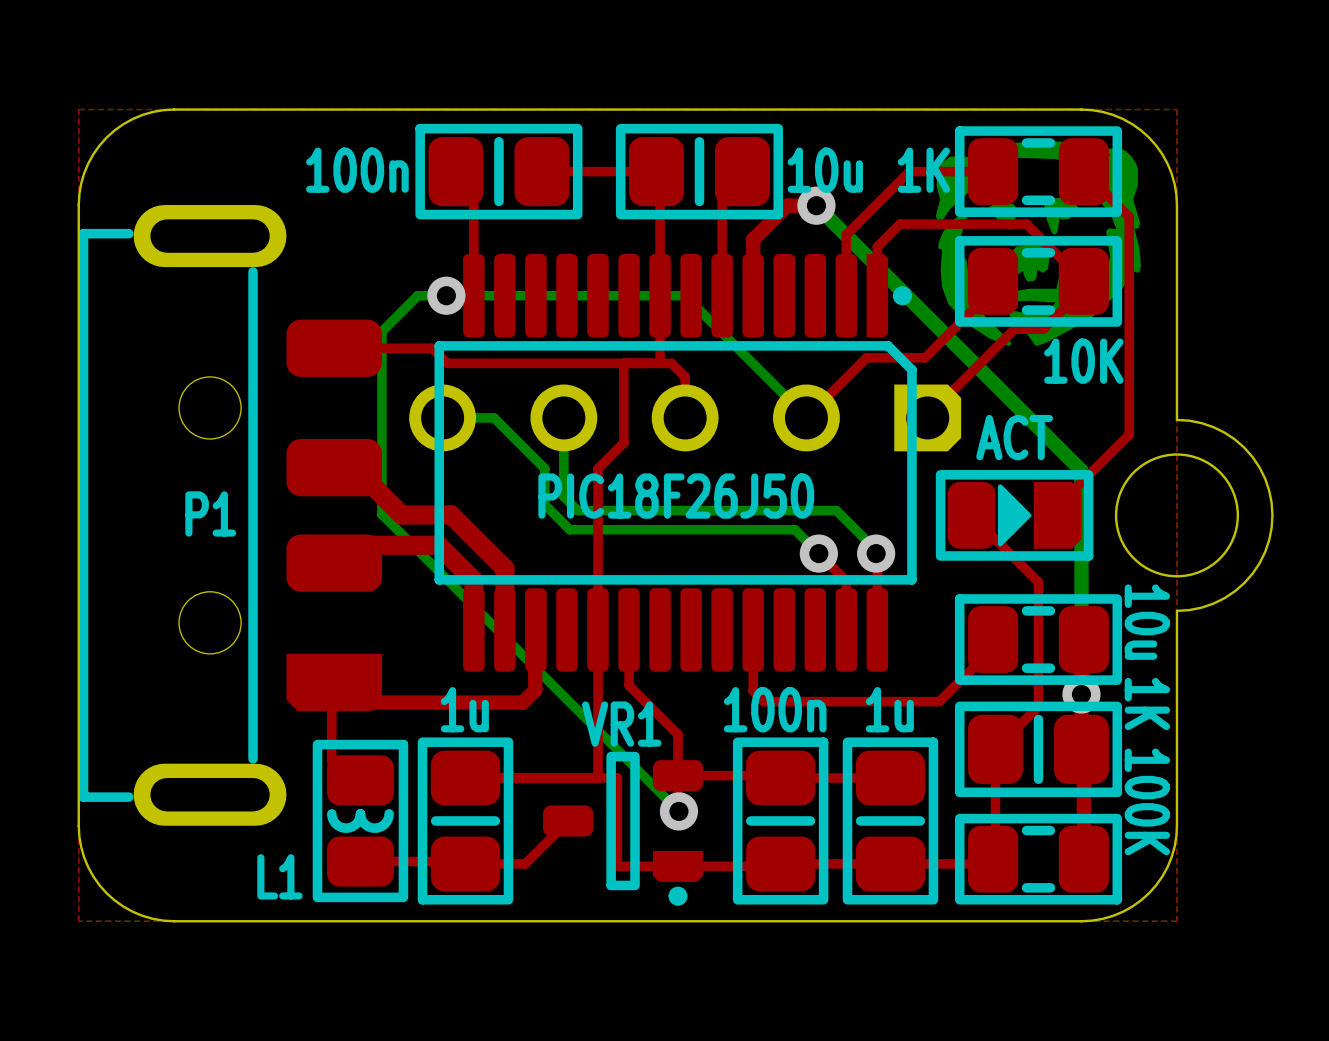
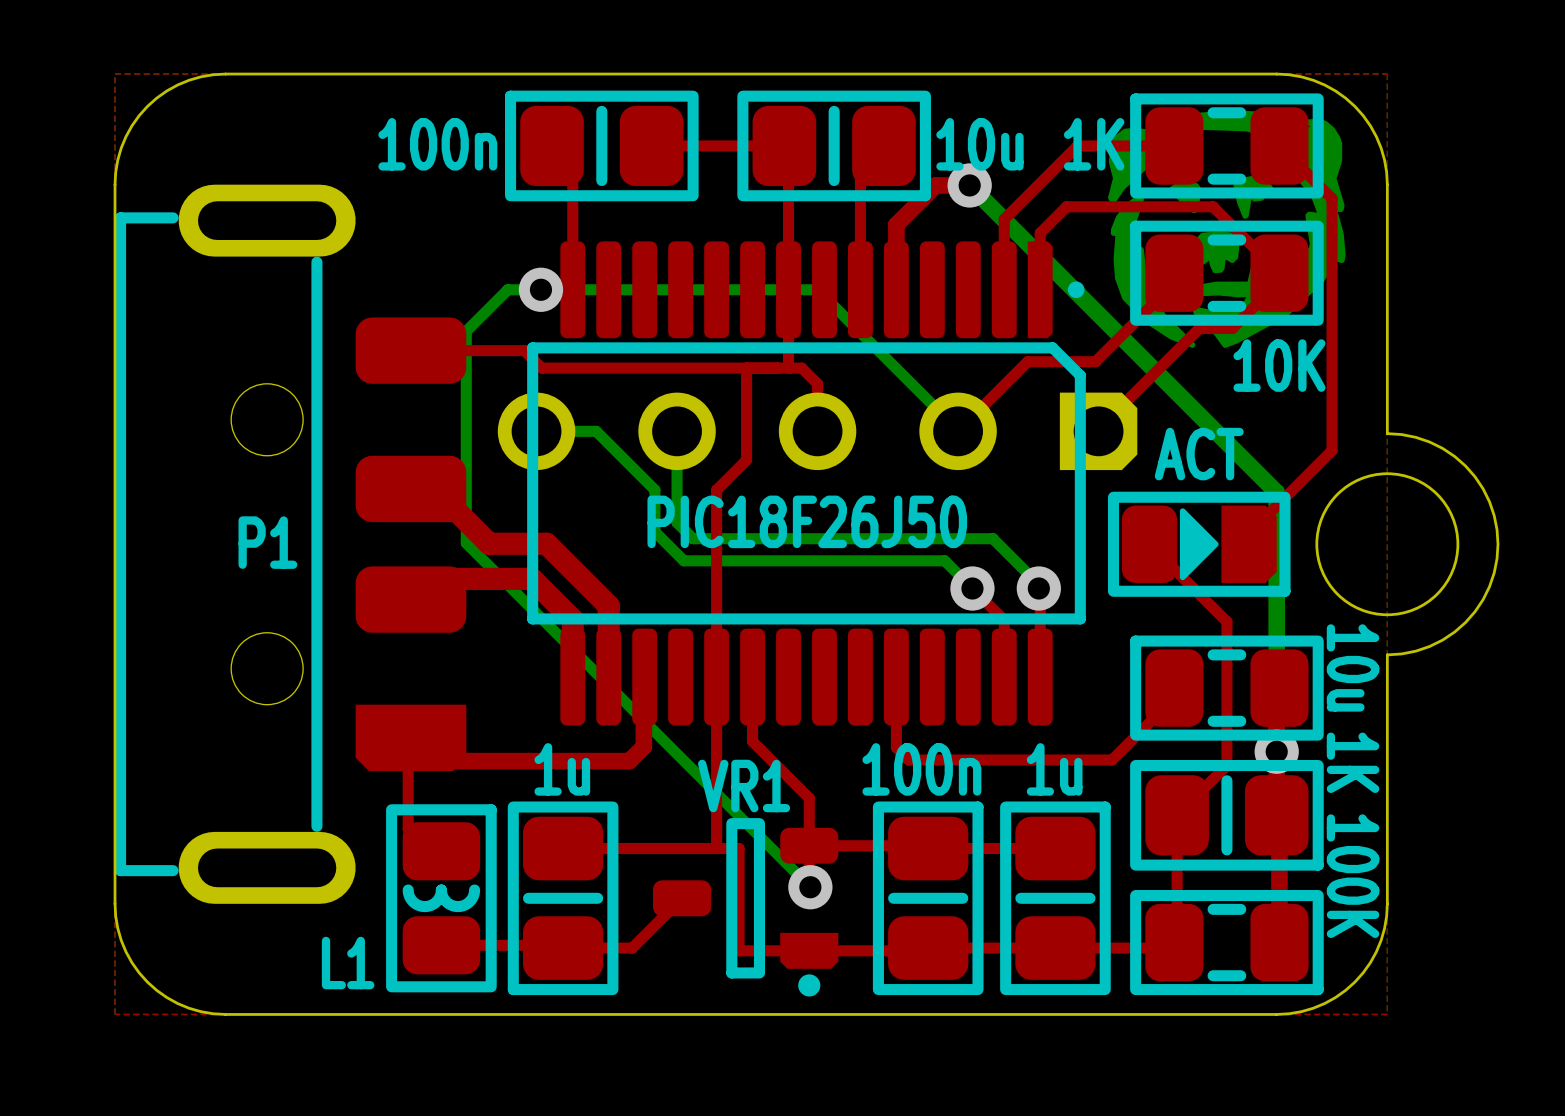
part footprint: [434, 253, 917, 672] -> [527, 241, 1086, 726]

